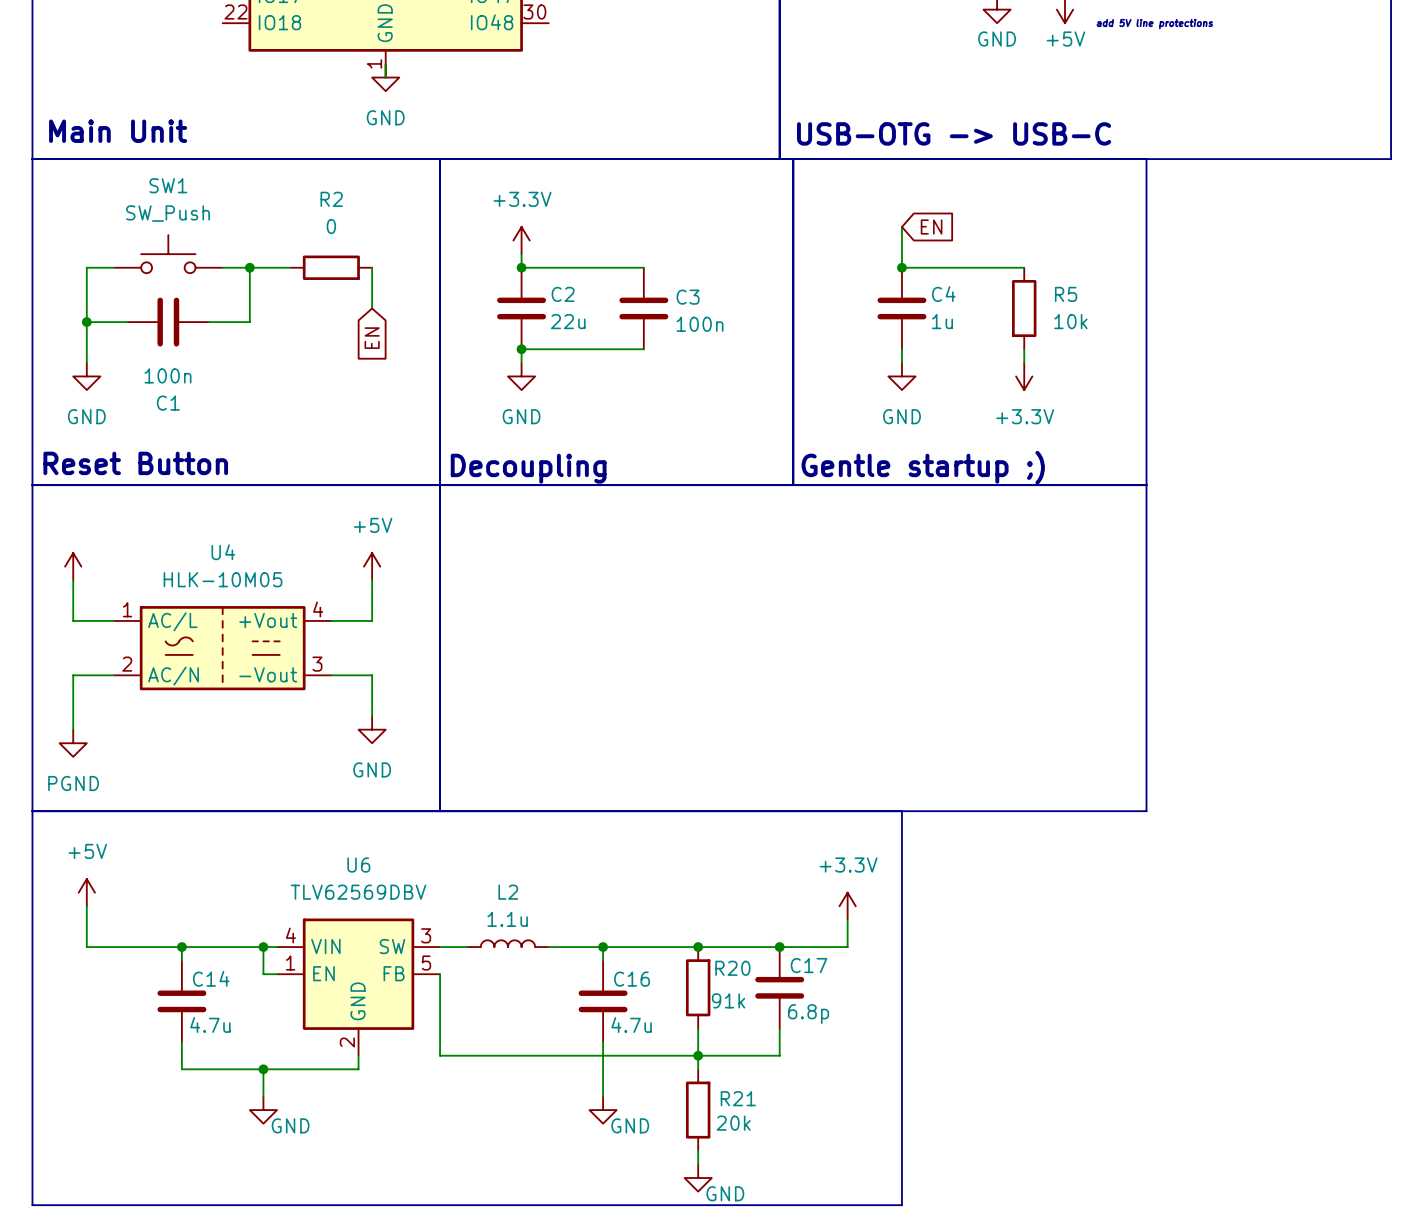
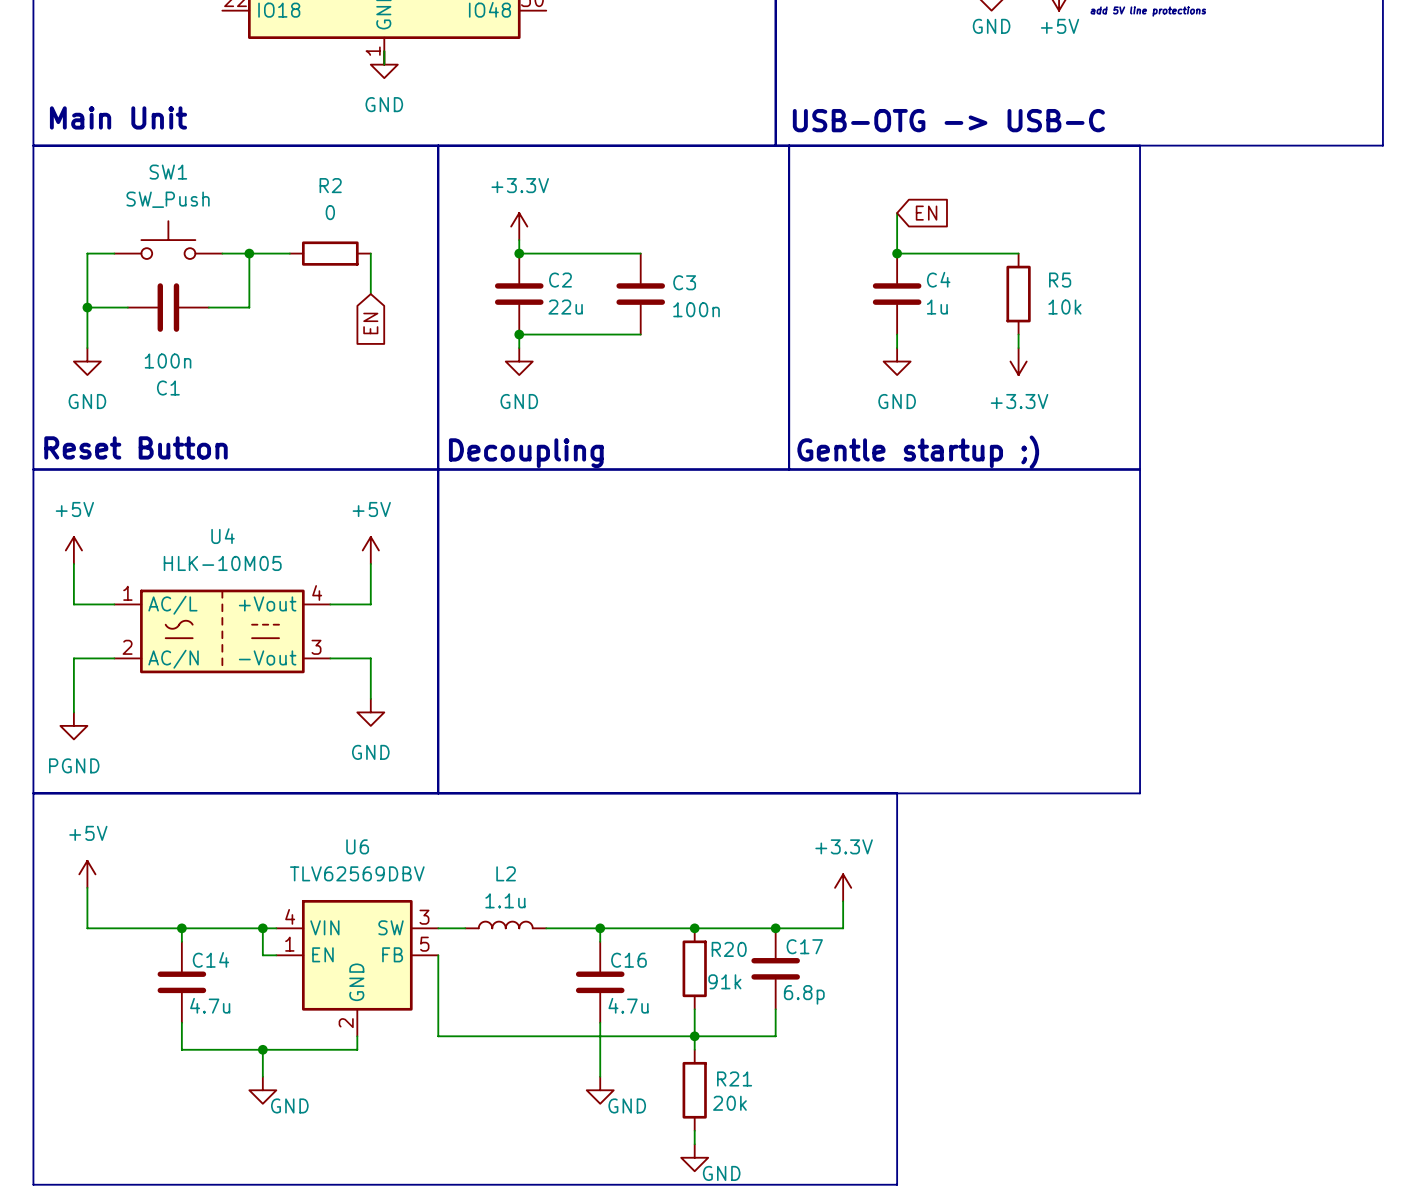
power symbol text: none -> +5V (74, 509)

